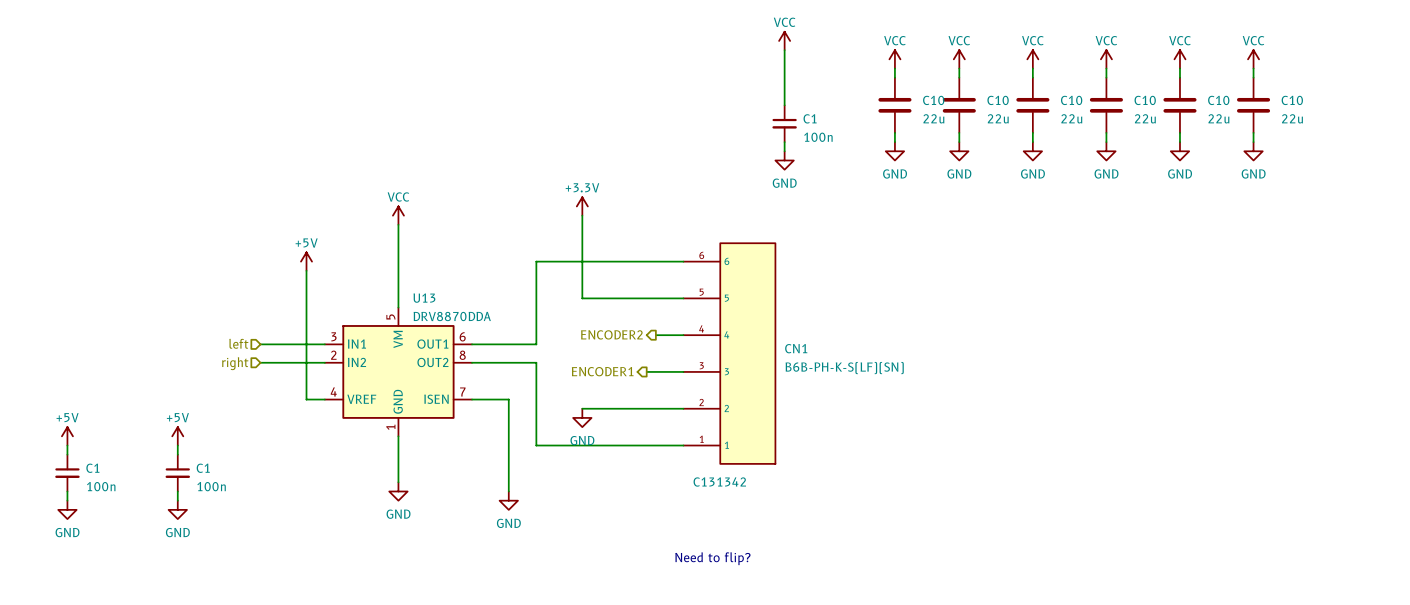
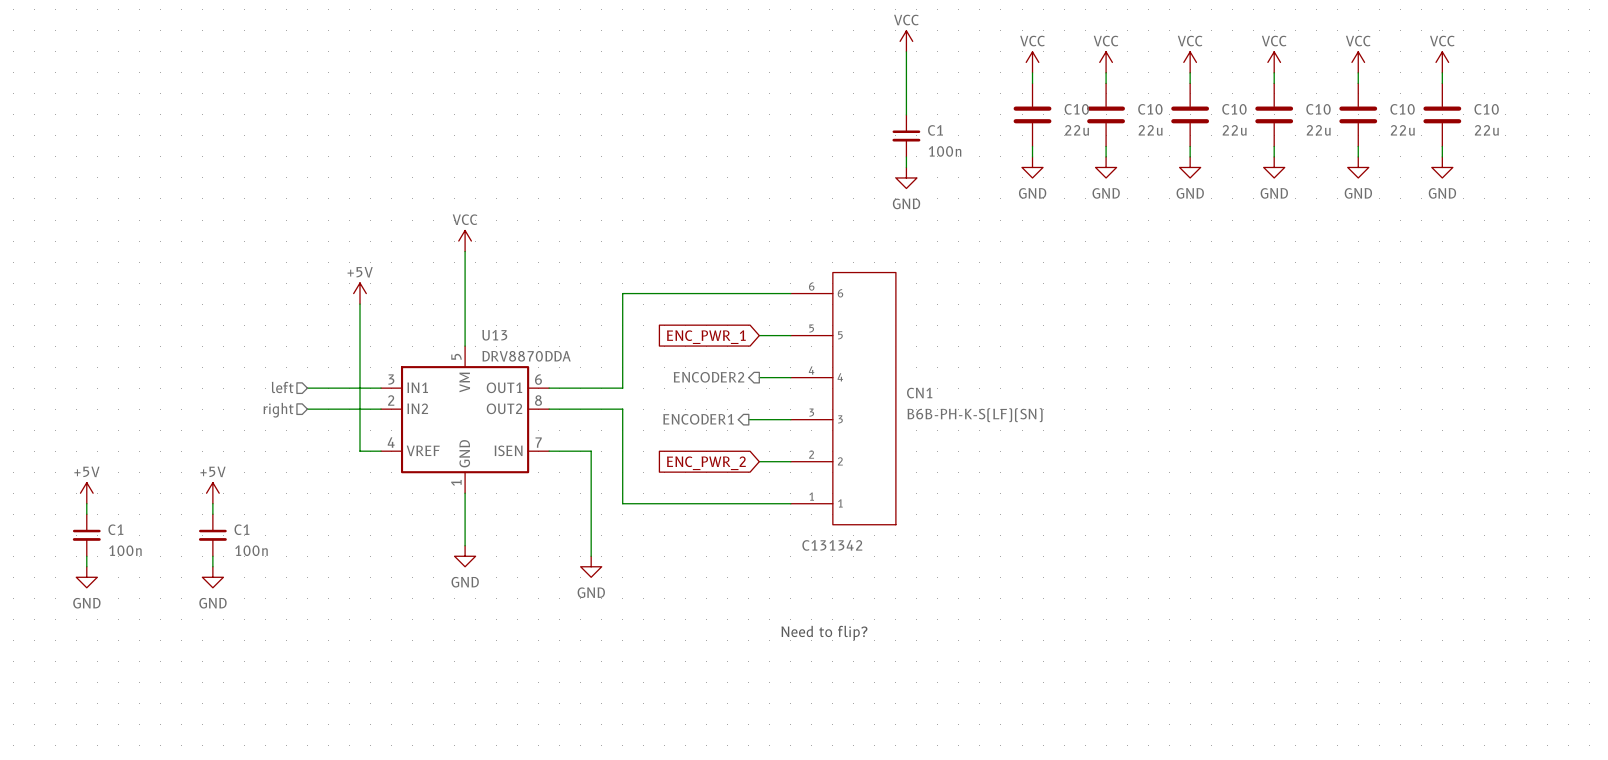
power symbol: +3.3V (582, 206) -> none
wire: (582, 215) (582, 298) (655, 298) -> none
global label: none -> ENC_PWR_1 (706, 337)
wire: (582, 408) (655, 408) -> none
global label: none -> ENC_PWR_2 (706, 463)
power symbol: GND (582, 417) -> none

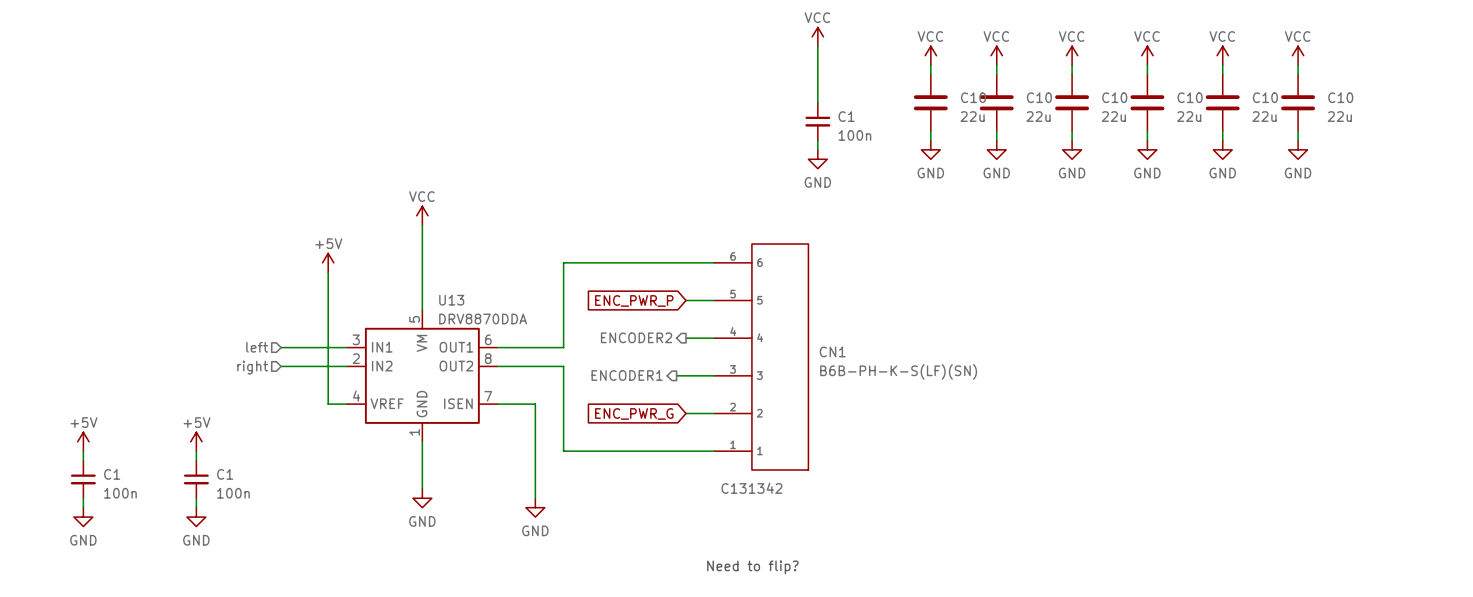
global label: ENC_PWR_1 (706, 337) -> ENC_PWR_P (634, 300)
global label: ENC_PWR_2 (706, 463) -> ENC_PWR_G (634, 413)

